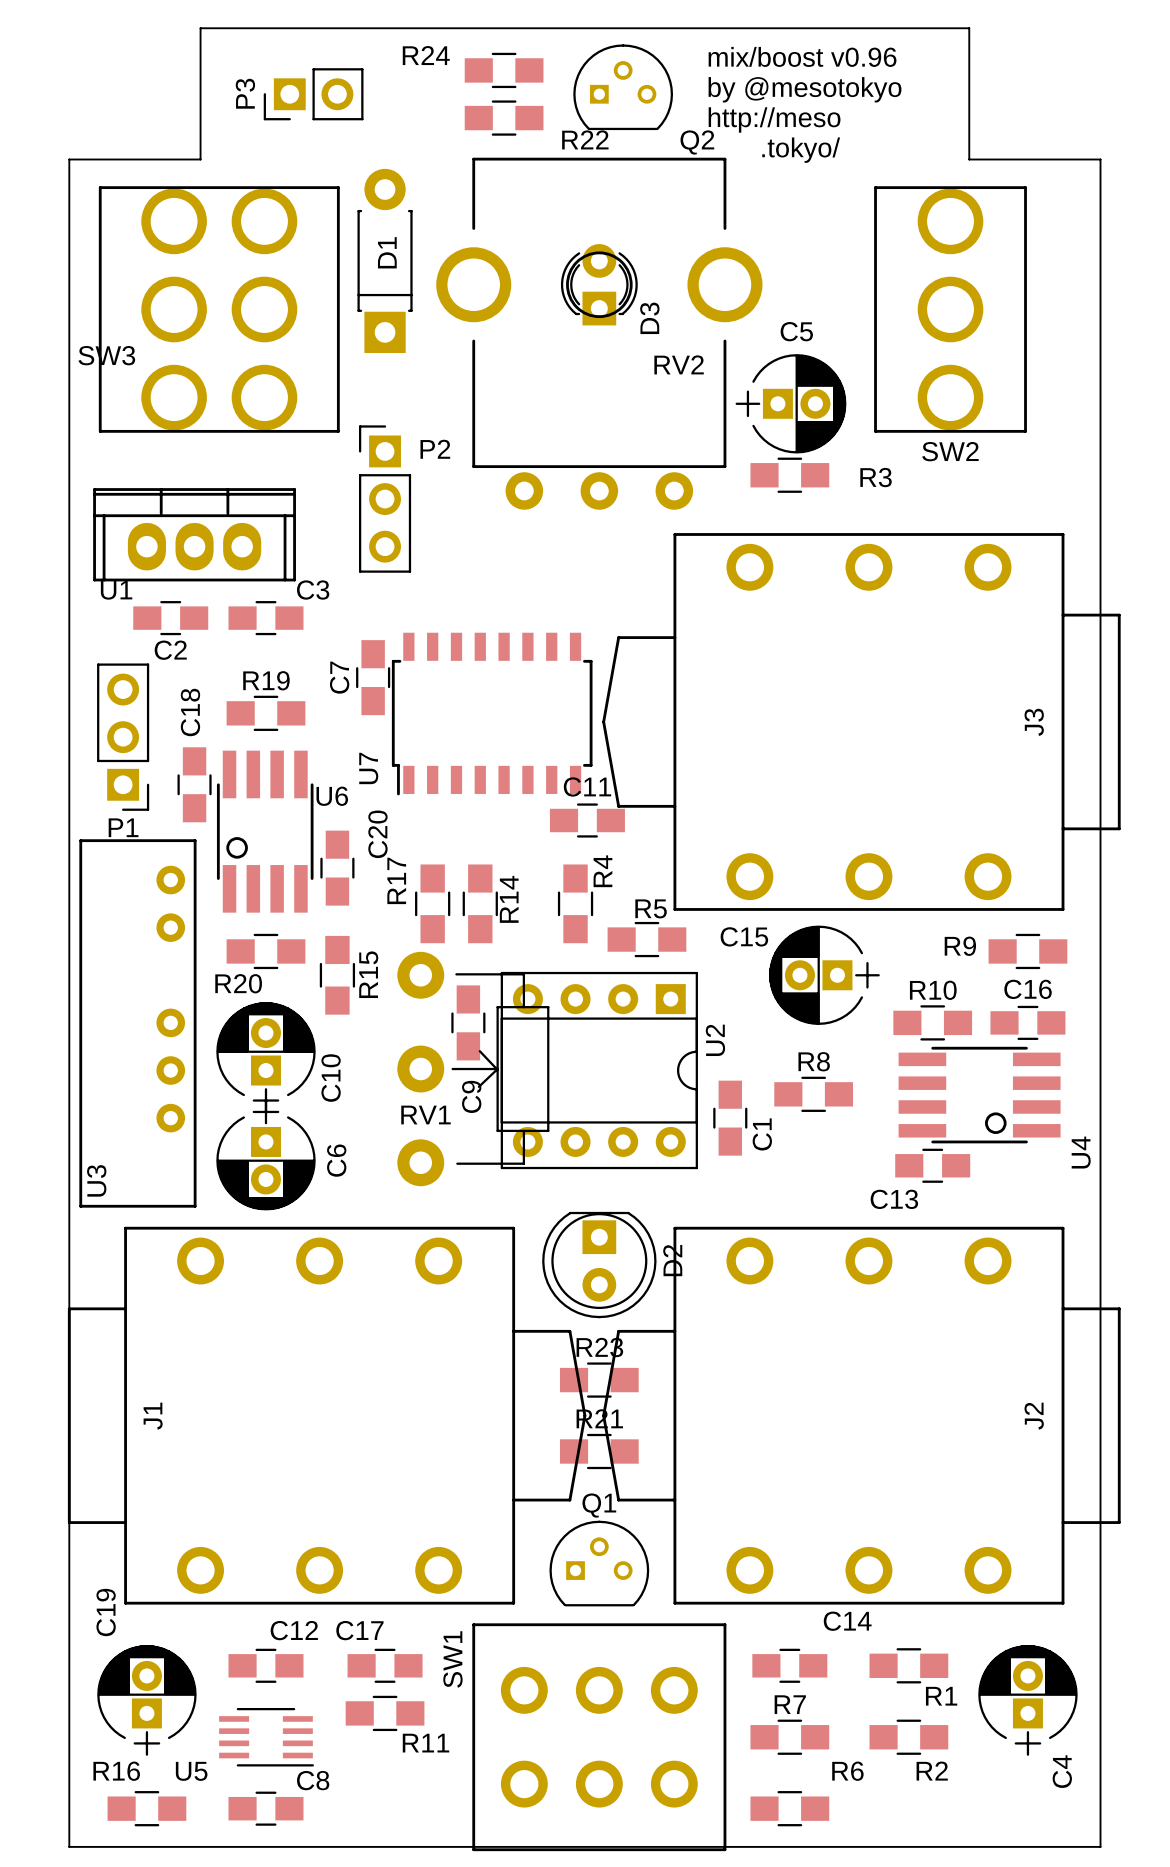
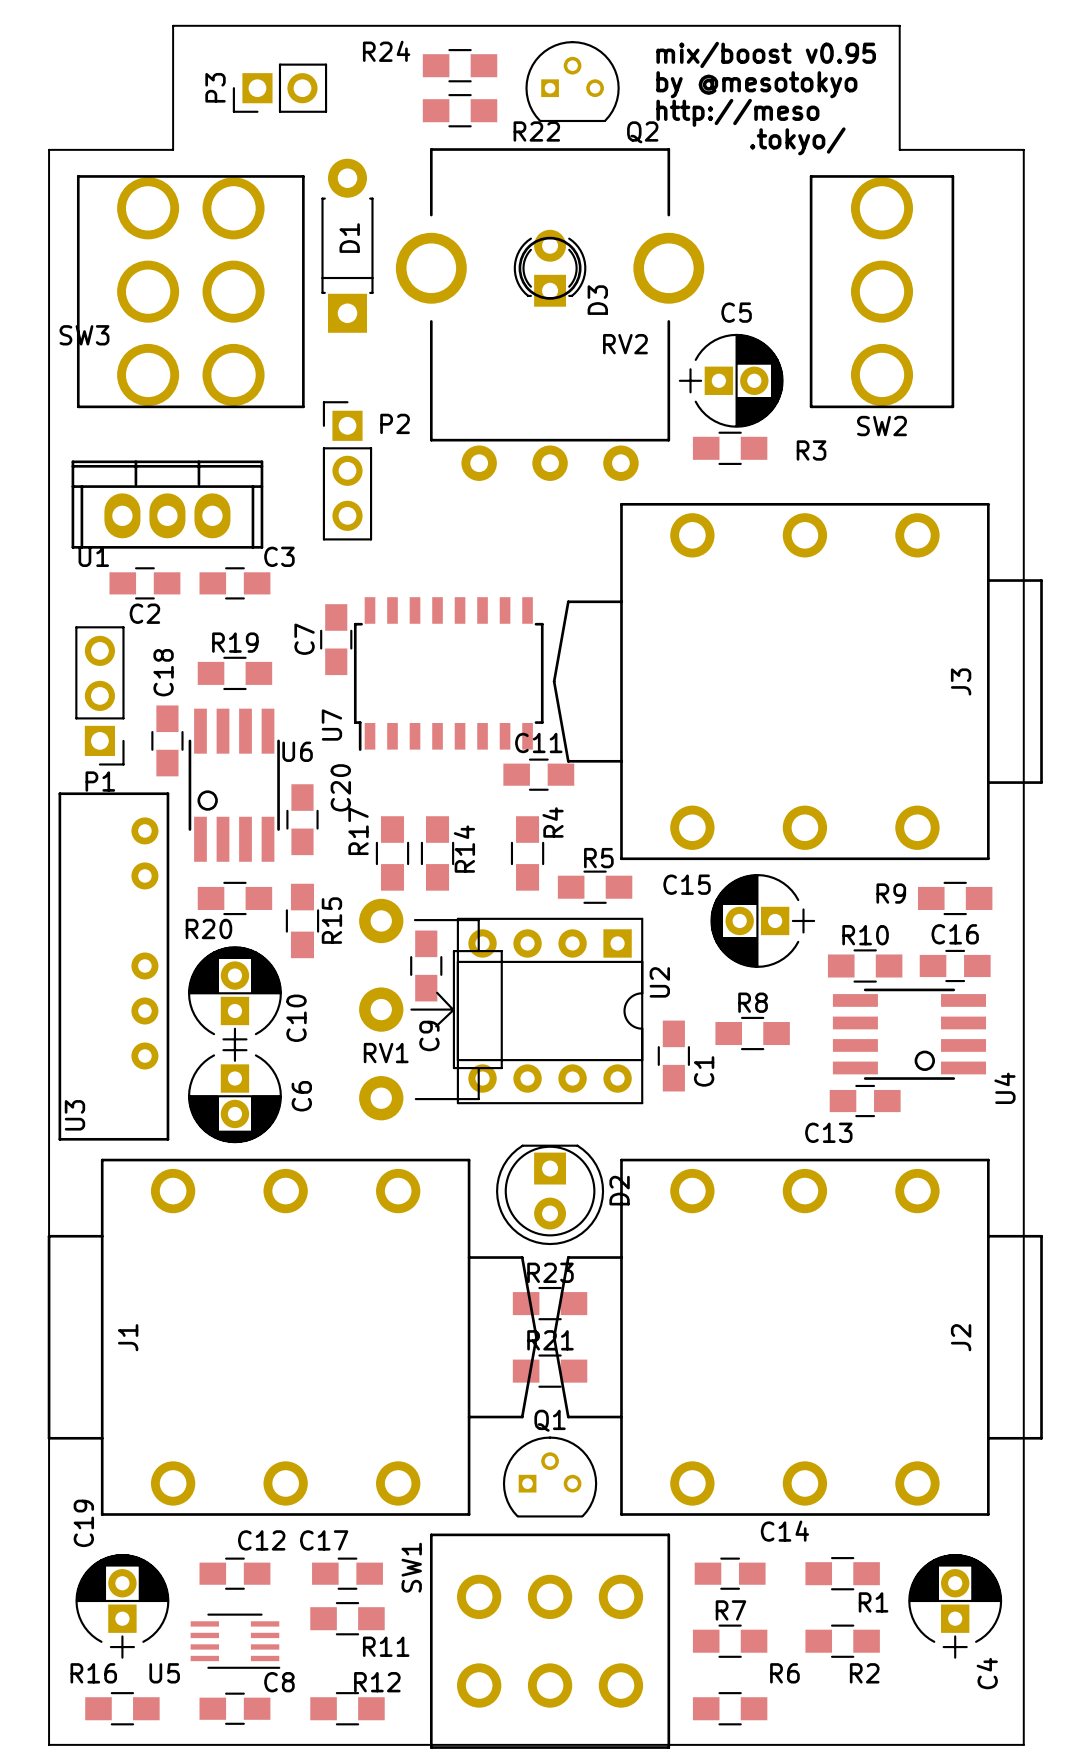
text: mix/boost v0.96 (802, 56) -> mix/boost v0.95 (766, 54)
R12: none -> (347, 1708)

